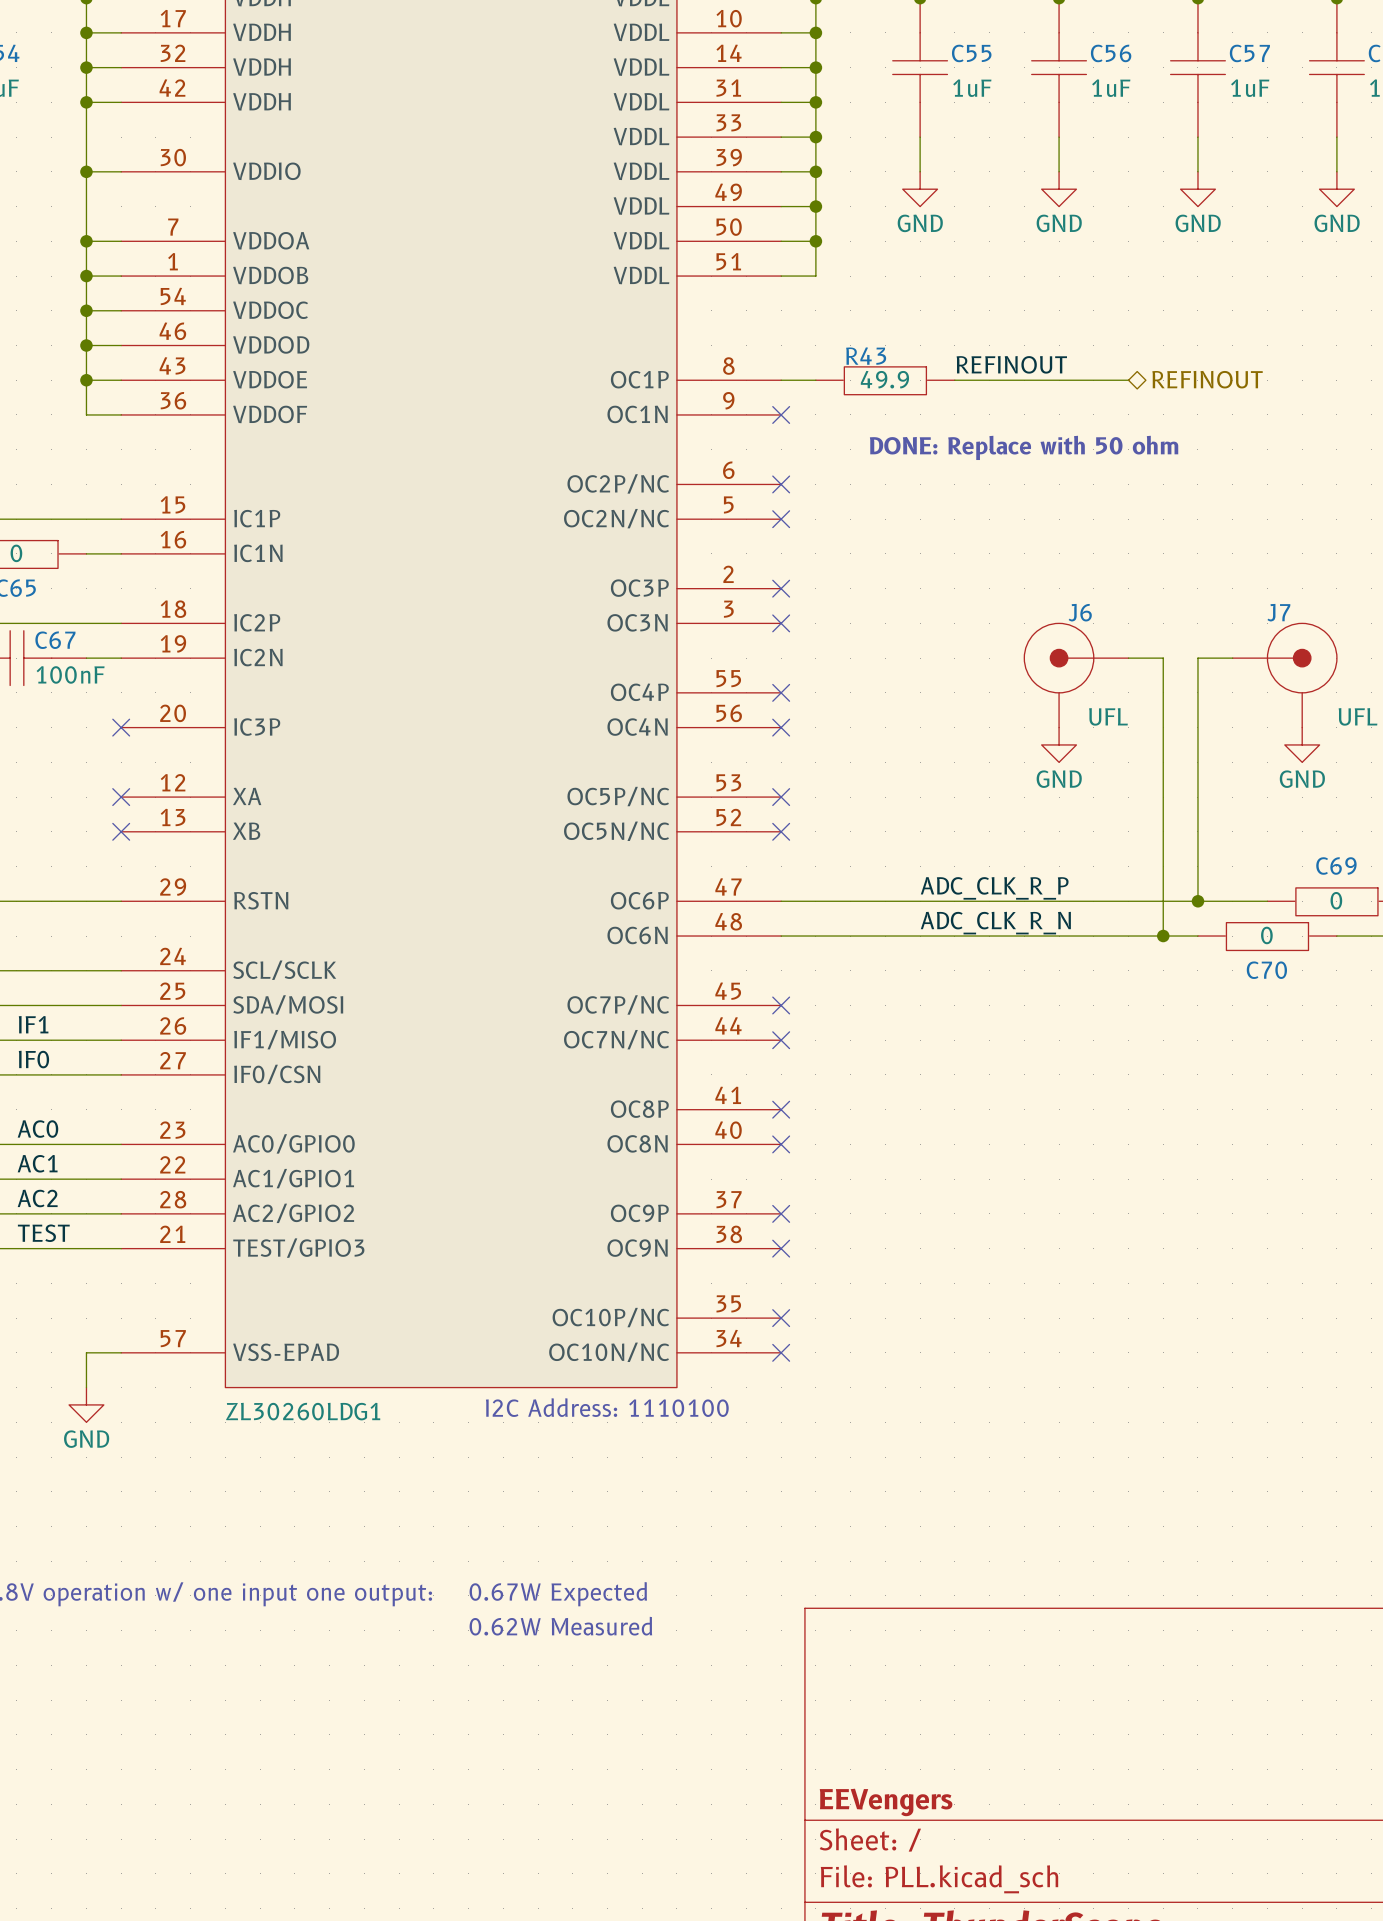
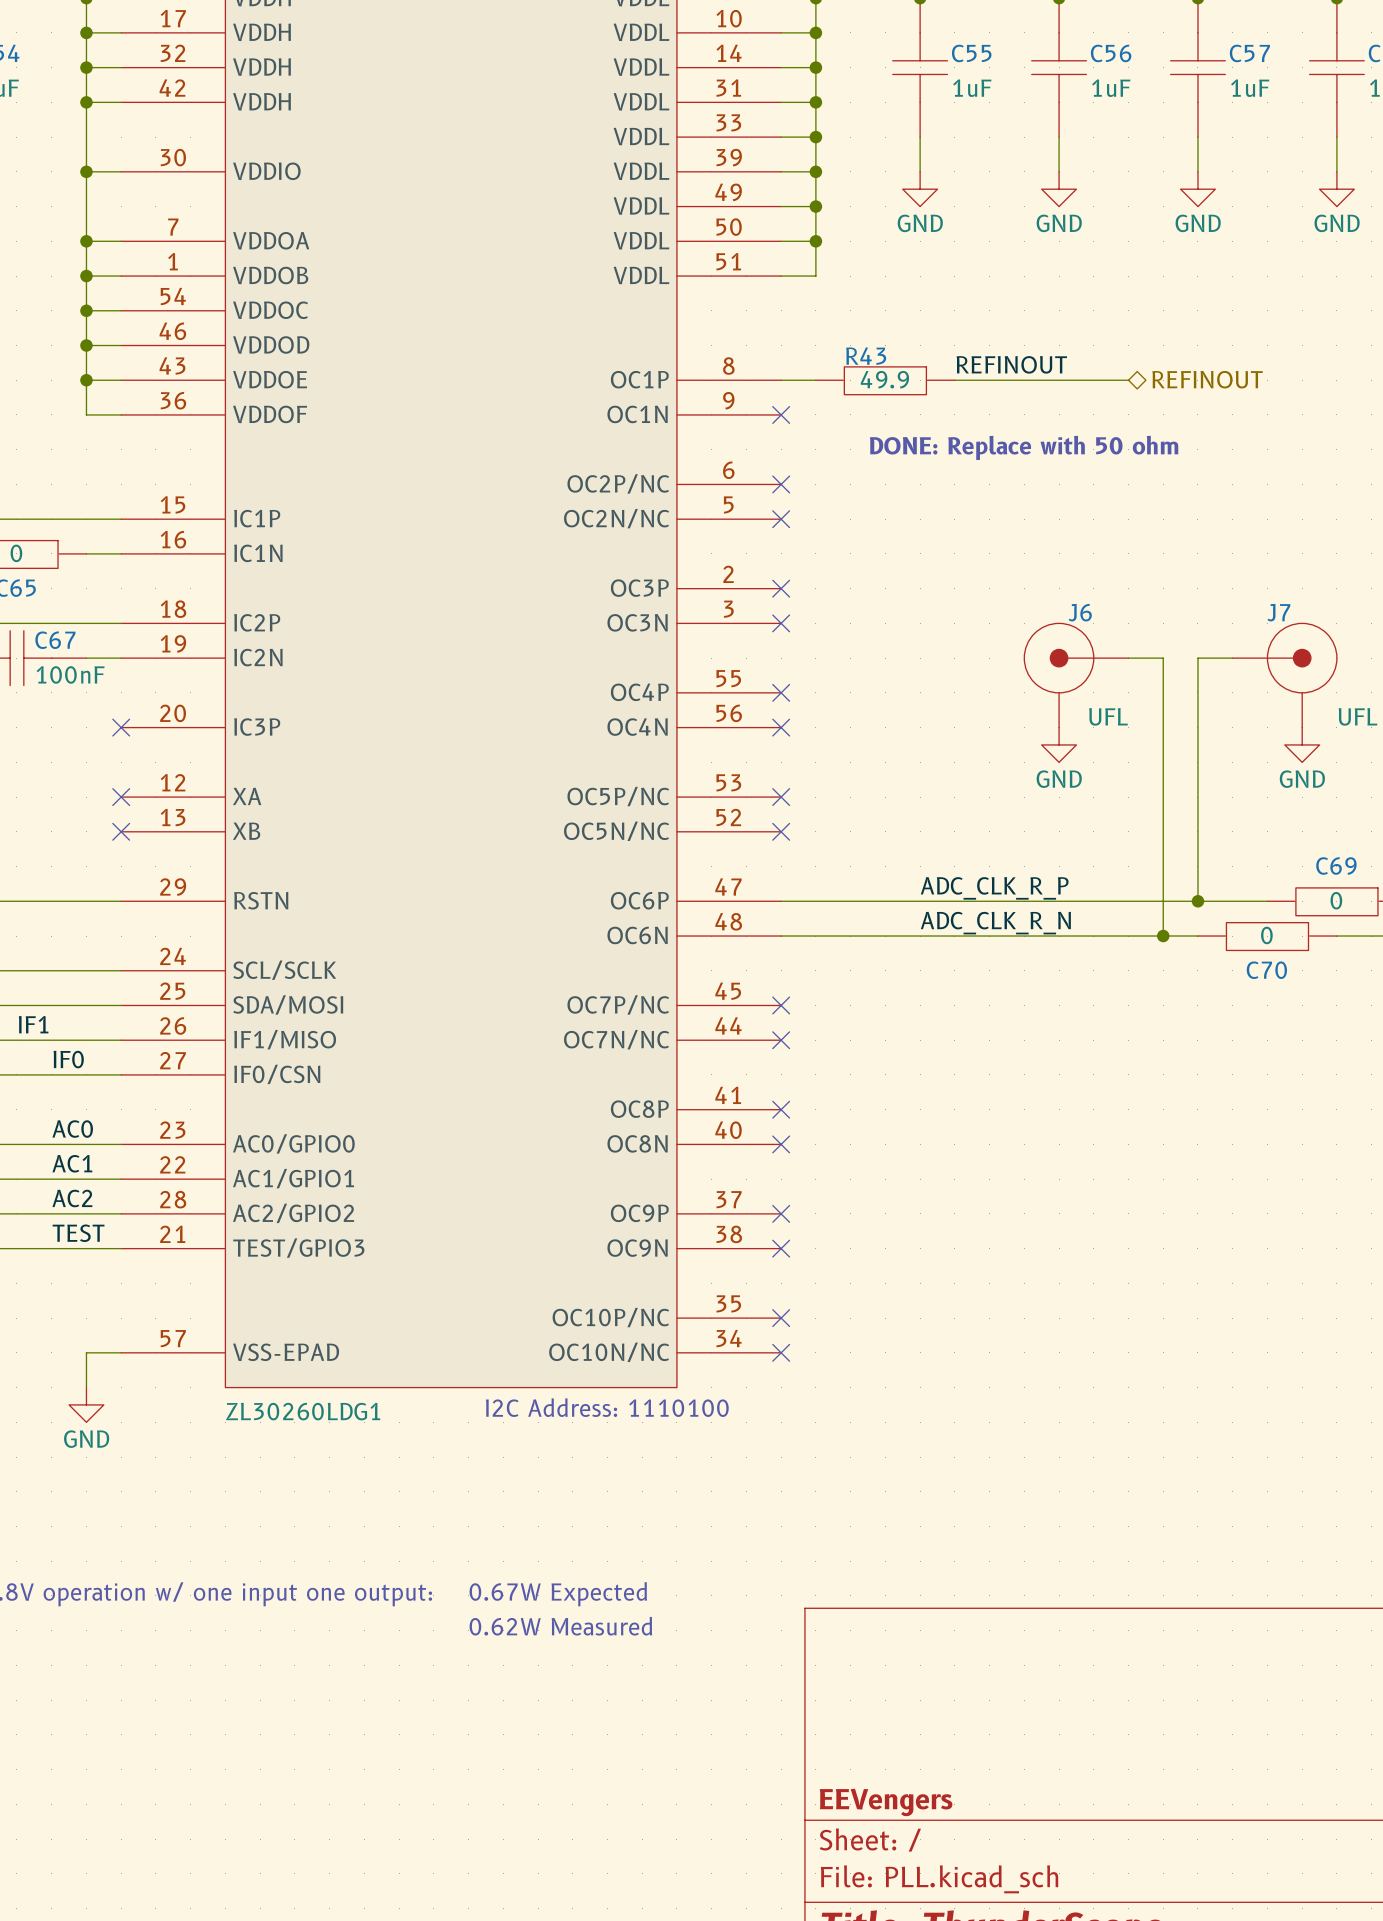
label position: IF0 (33, 1059) -> IF0 (68, 1059)
label position: AC0 (37, 1129) -> AC0 (72, 1129)
label position: AC1 (37, 1163) -> AC1 (72, 1163)
label position: AC2 (37, 1198) -> AC2 (72, 1198)
label position: TEST (43, 1233) -> TEST (78, 1233)

